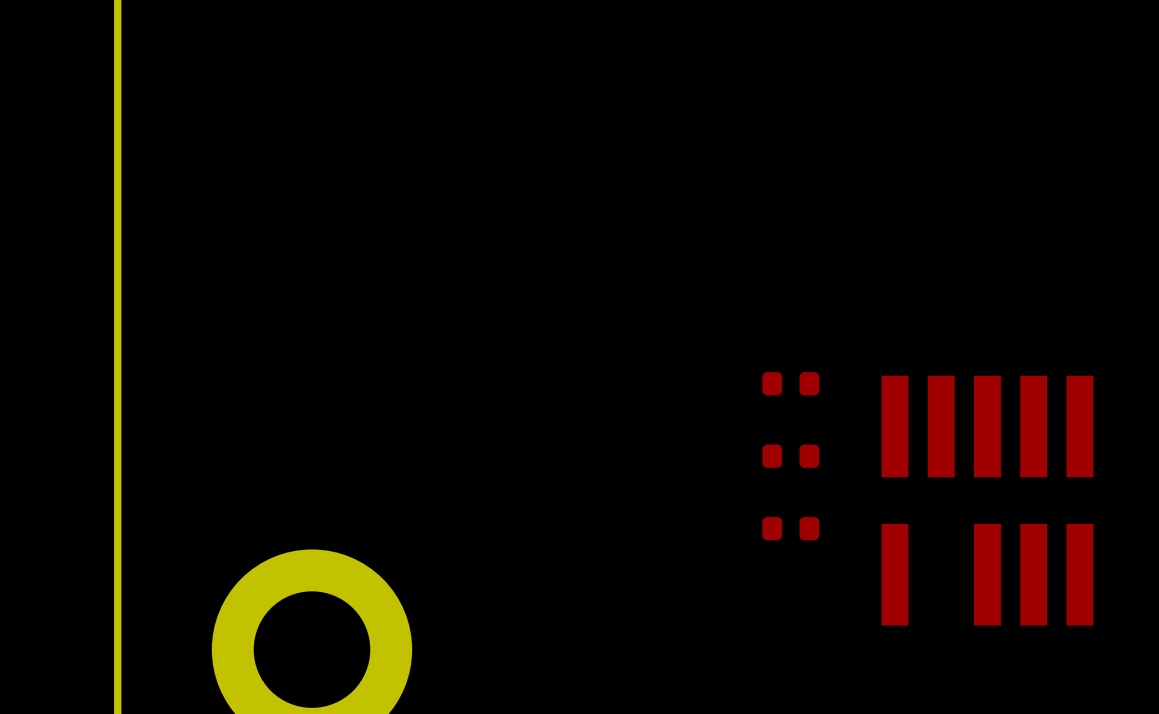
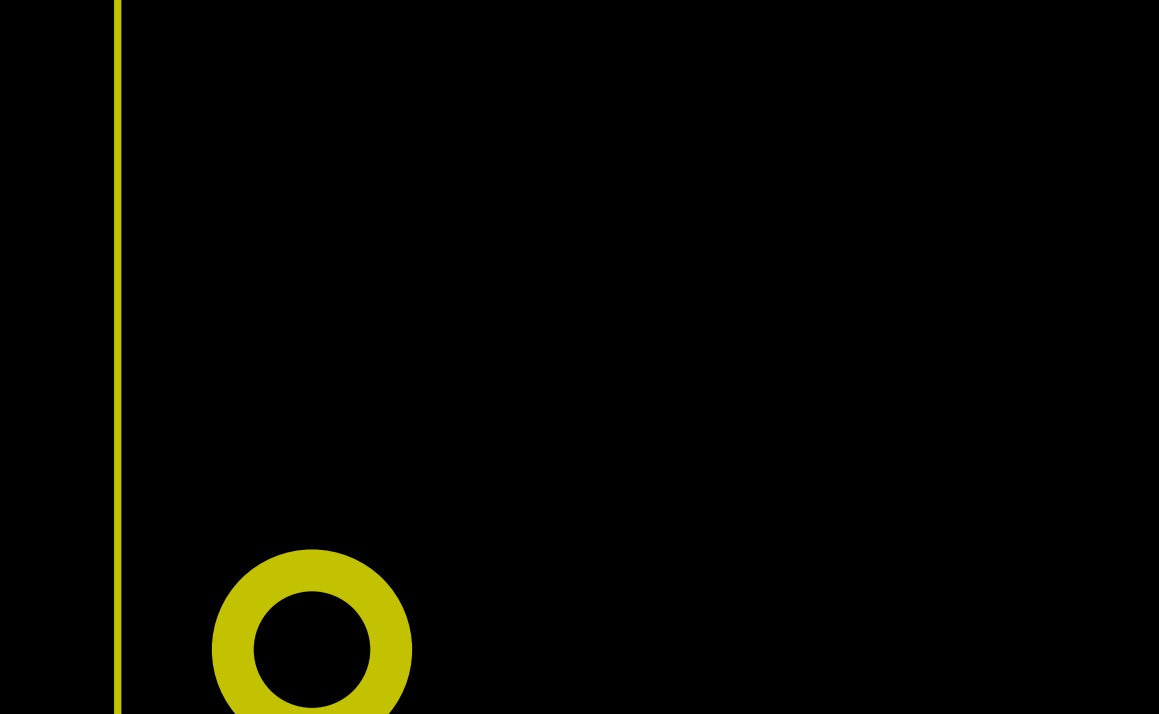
part: (790, 383) -> none
part: (790, 456) -> none
part: (987, 500) -> none
part: (790, 528) -> none

